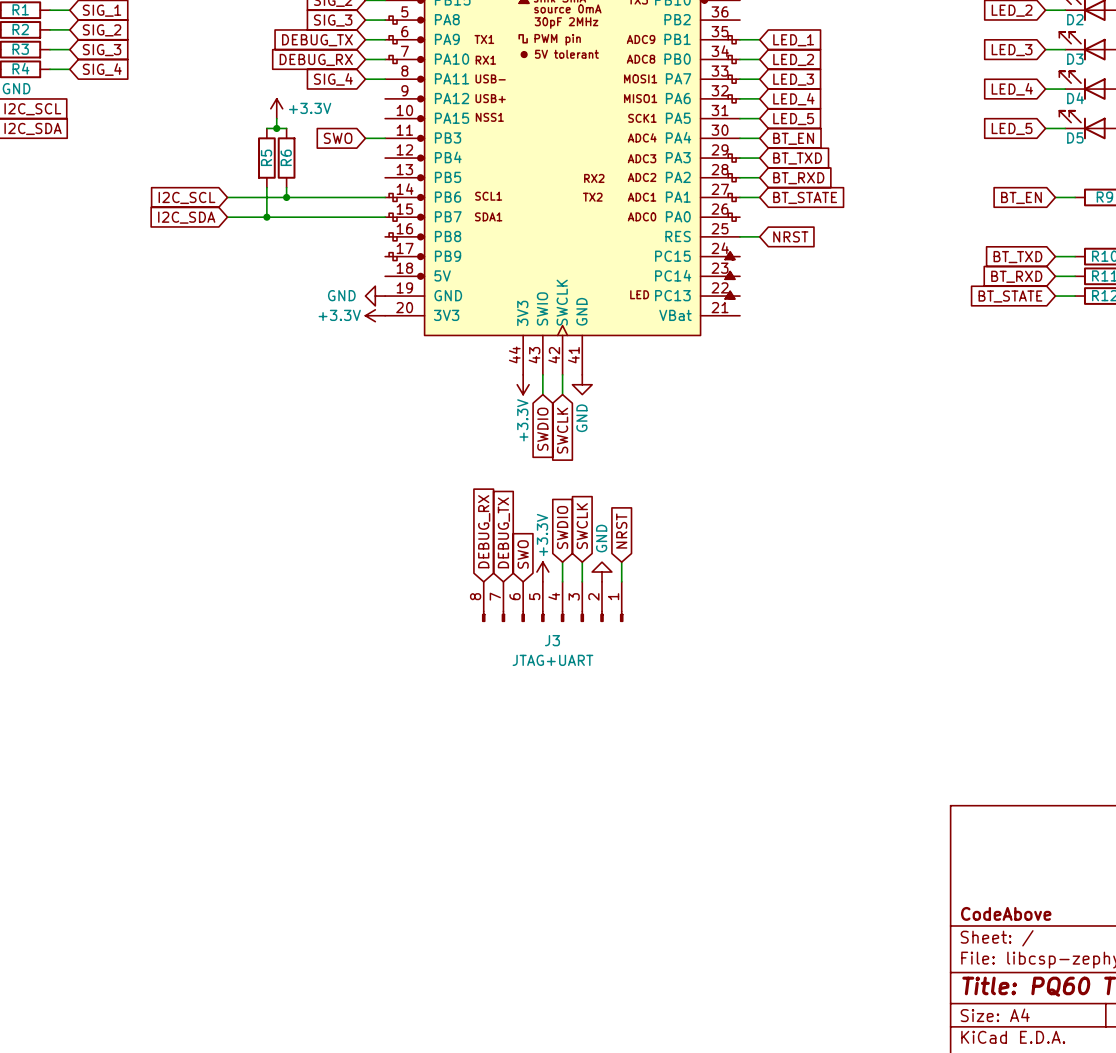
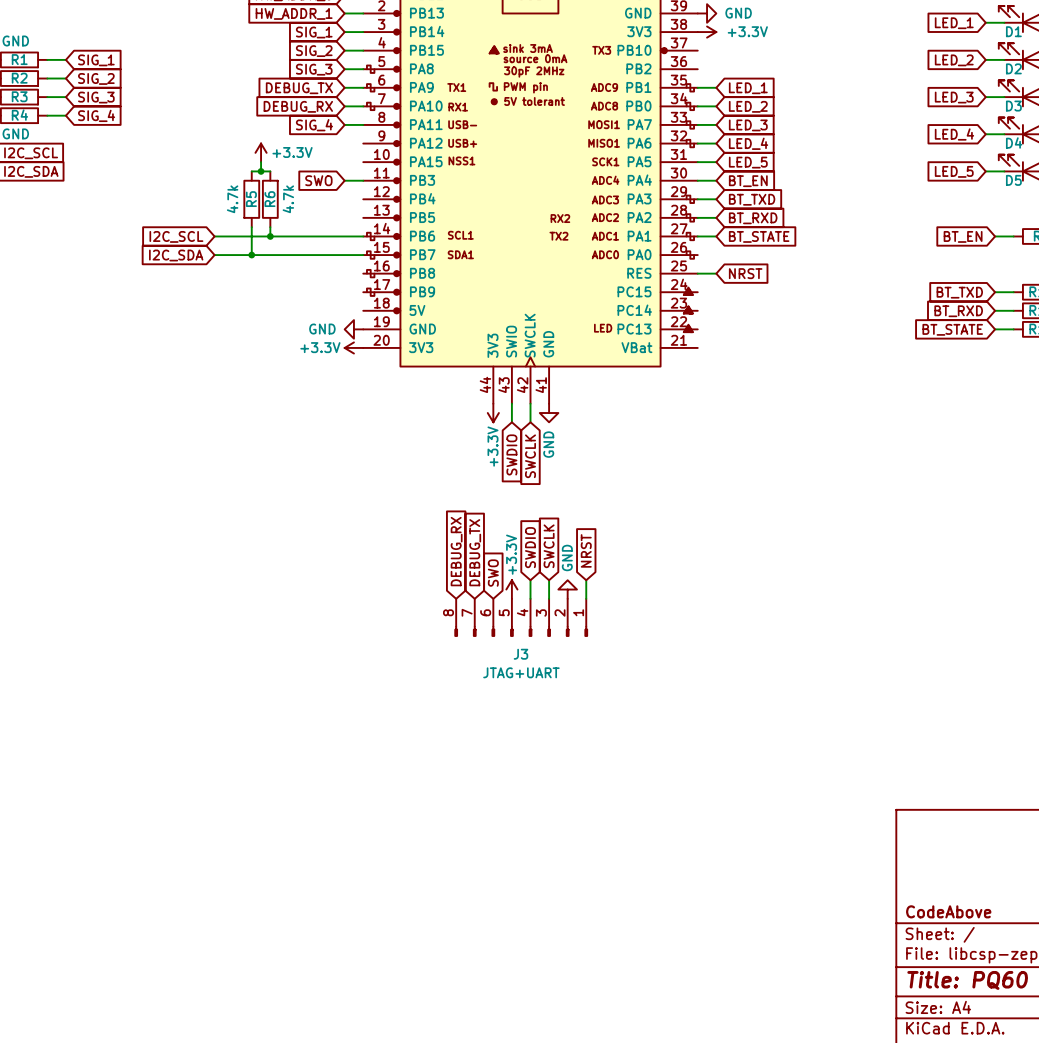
R5 value: none -> 4.7k (232, 199)
R6 value: none -> 4.7k (288, 199)

